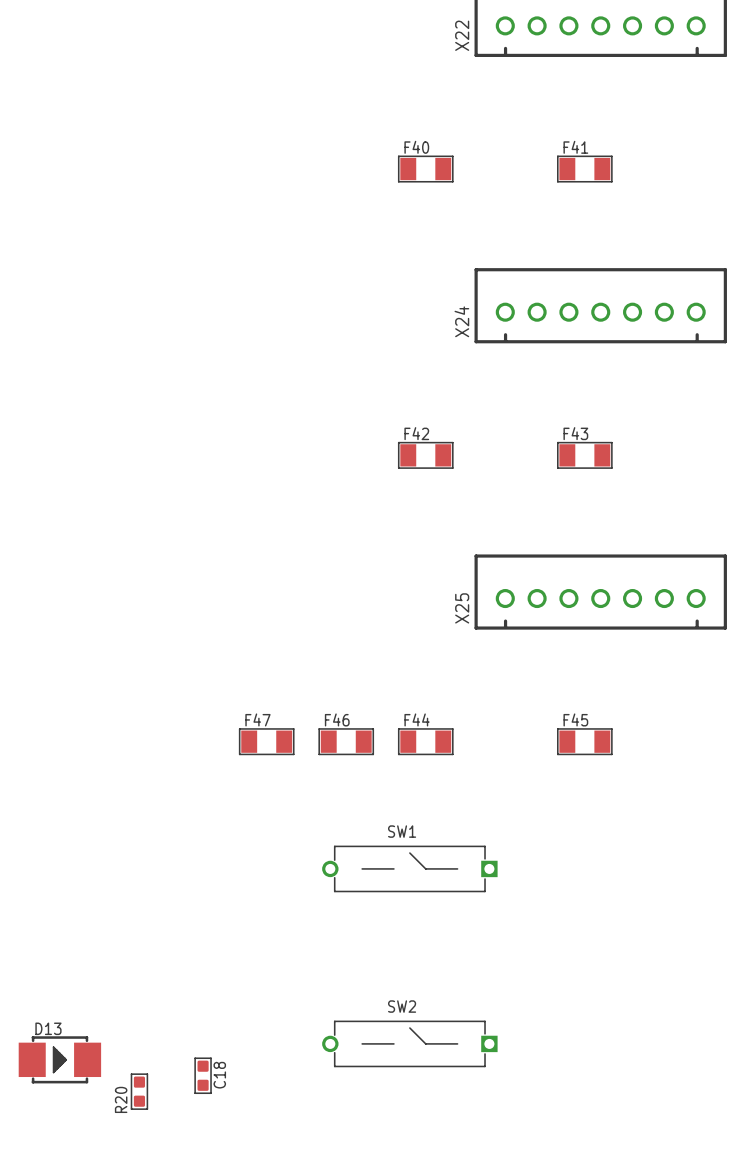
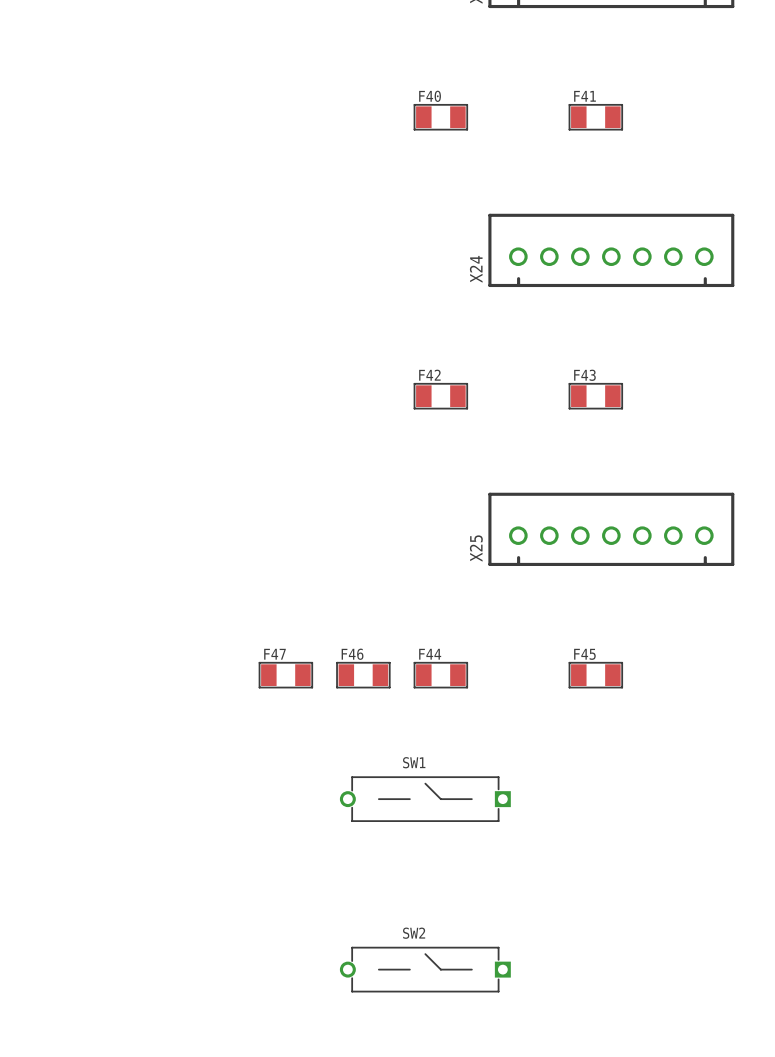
D13: (59, 1059) -> none
C18: (203, 1075) -> none
R20: (139, 1091) -> none

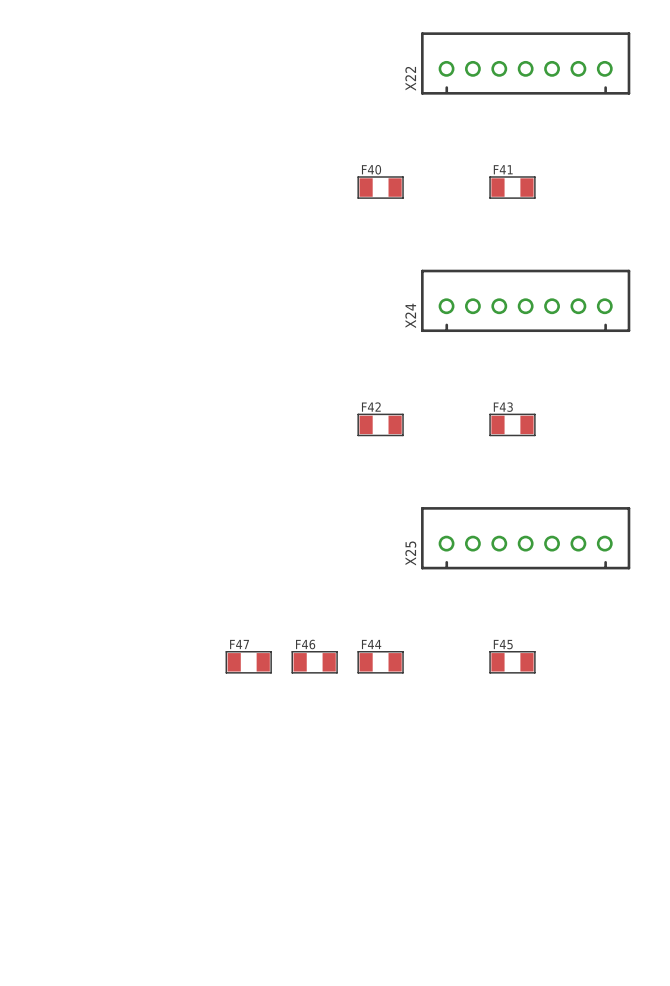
SW1: (425, 799) -> none
SW2: (425, 969) -> none

